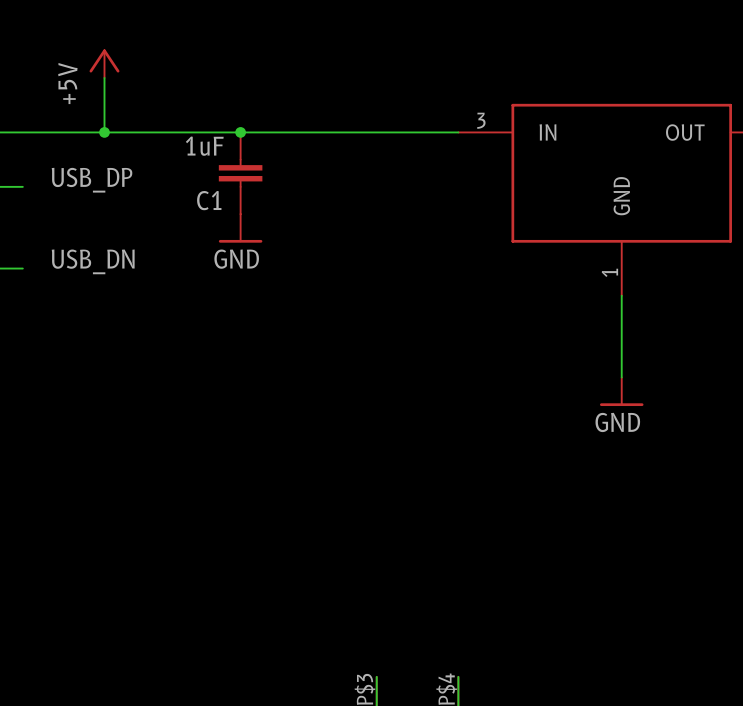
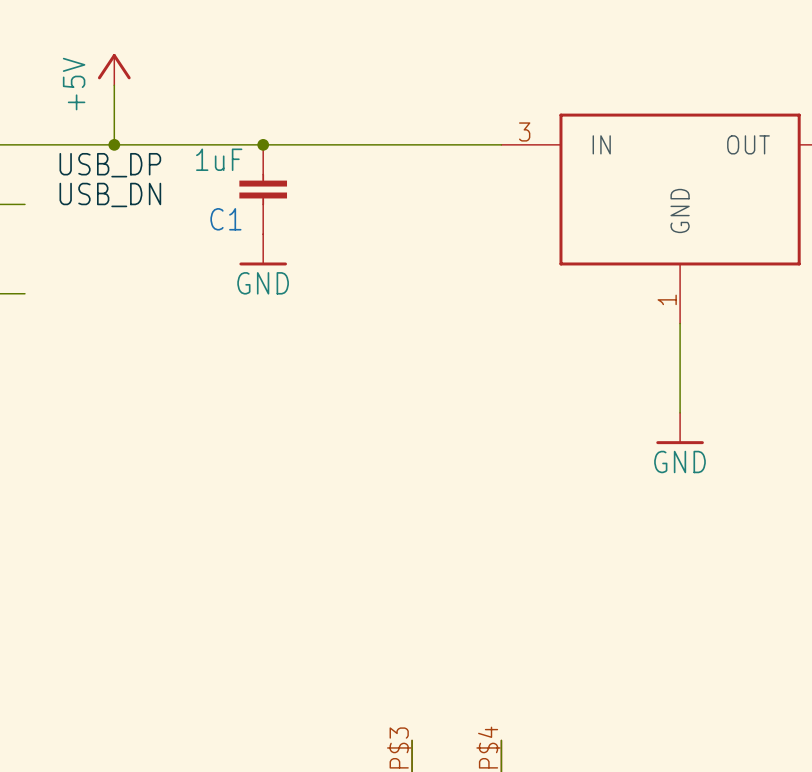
label: none -> USB_DP (110, 165)
label: USB_DP (92, 180) -> USB_DN (110, 194)
label: USB_DN (93, 261) -> none

